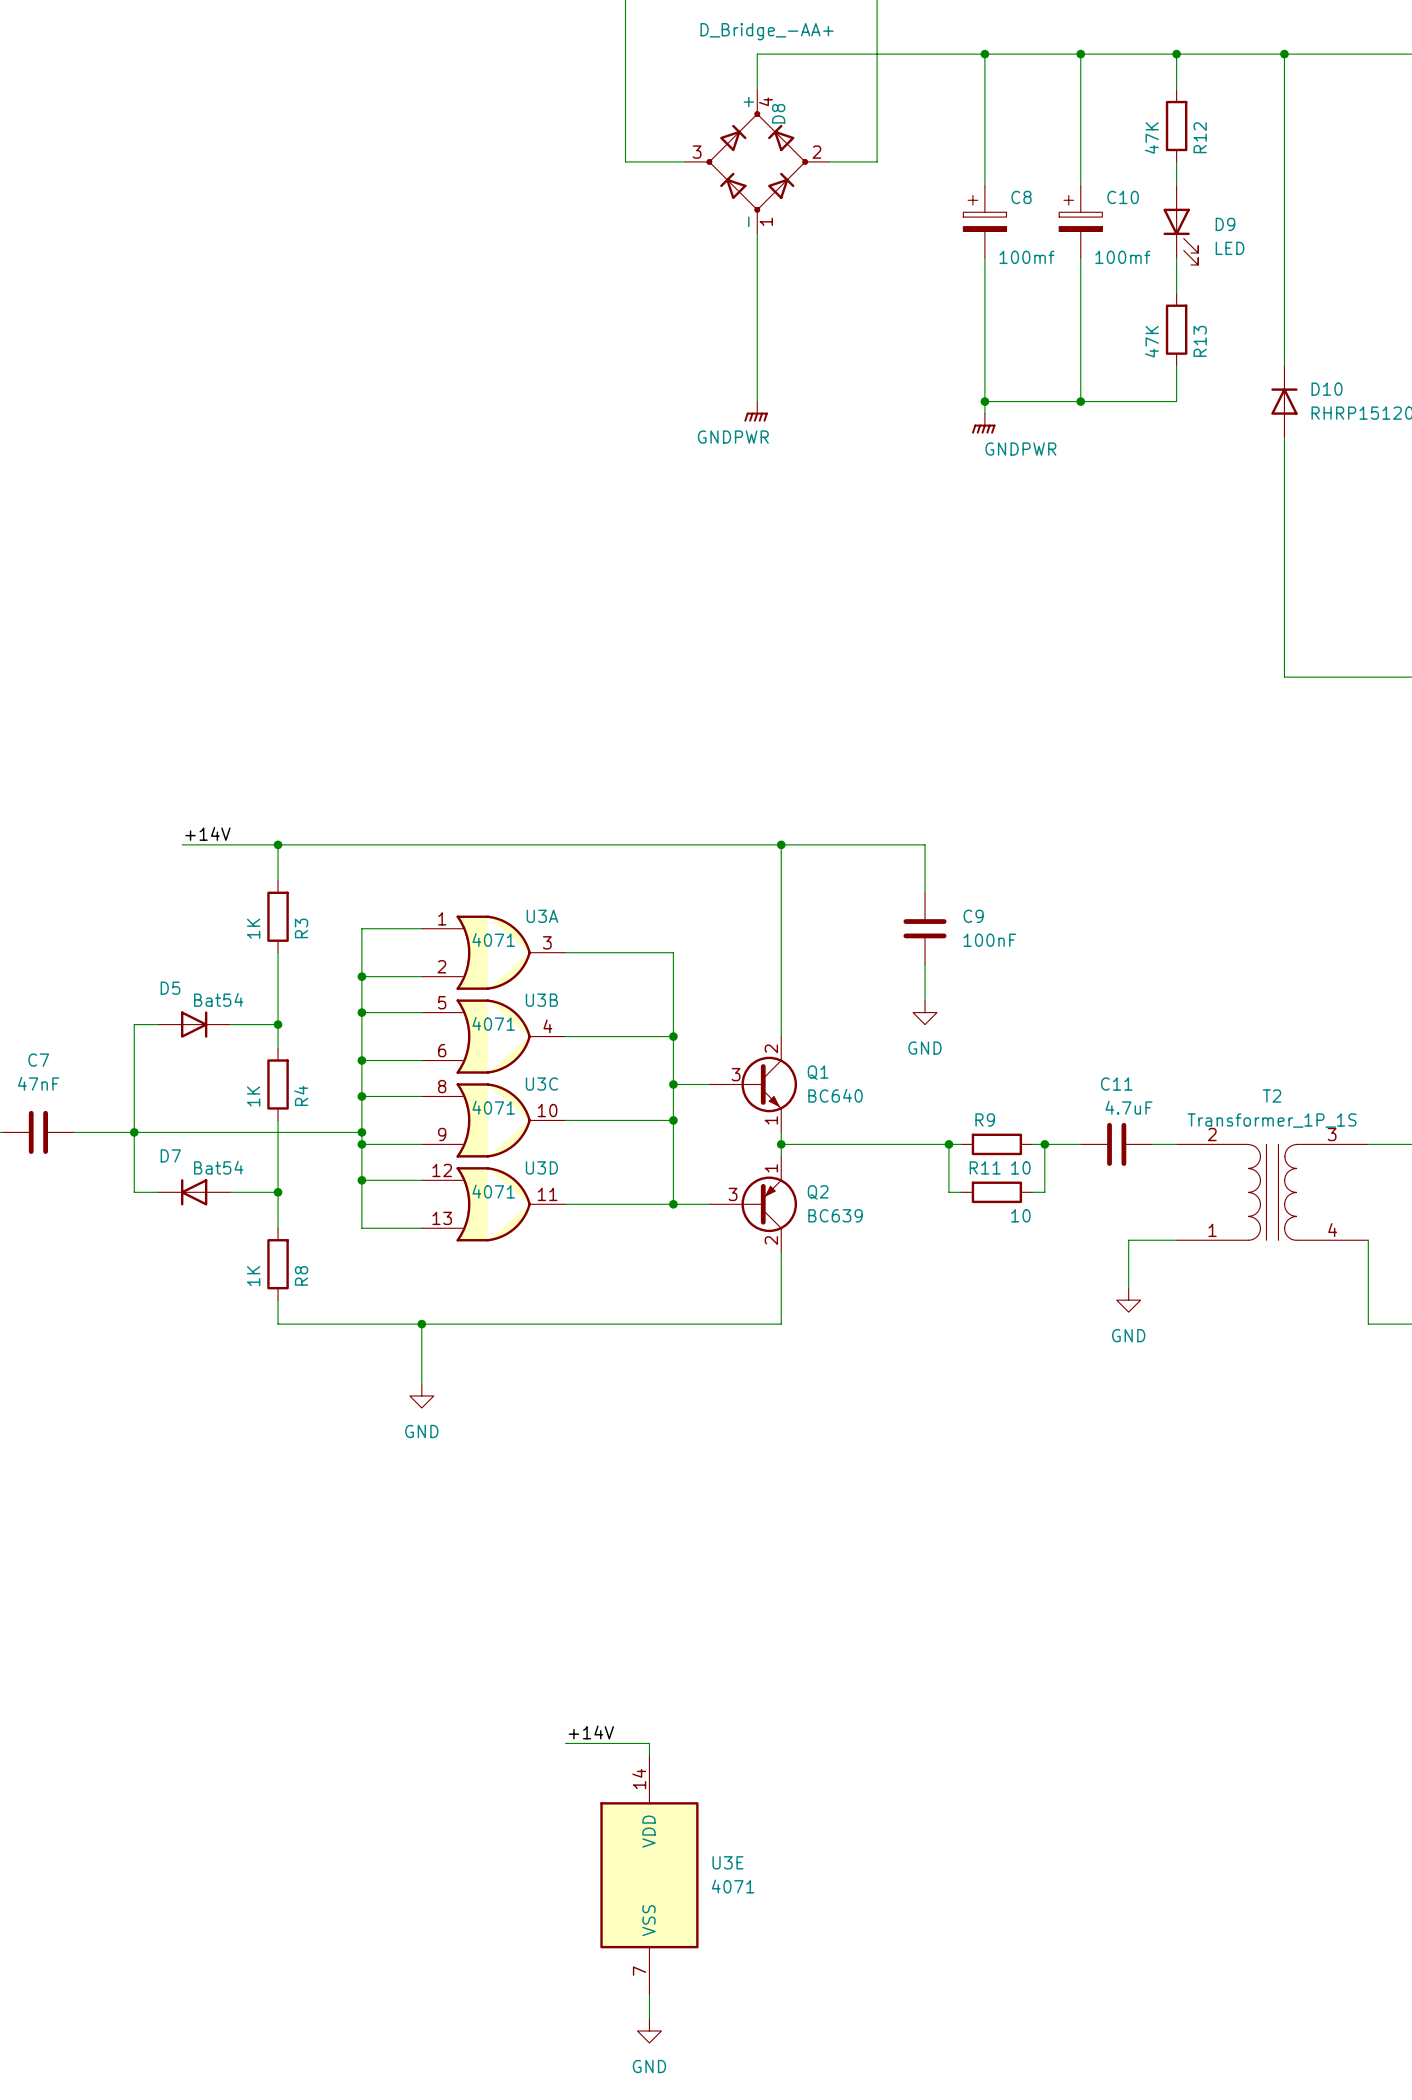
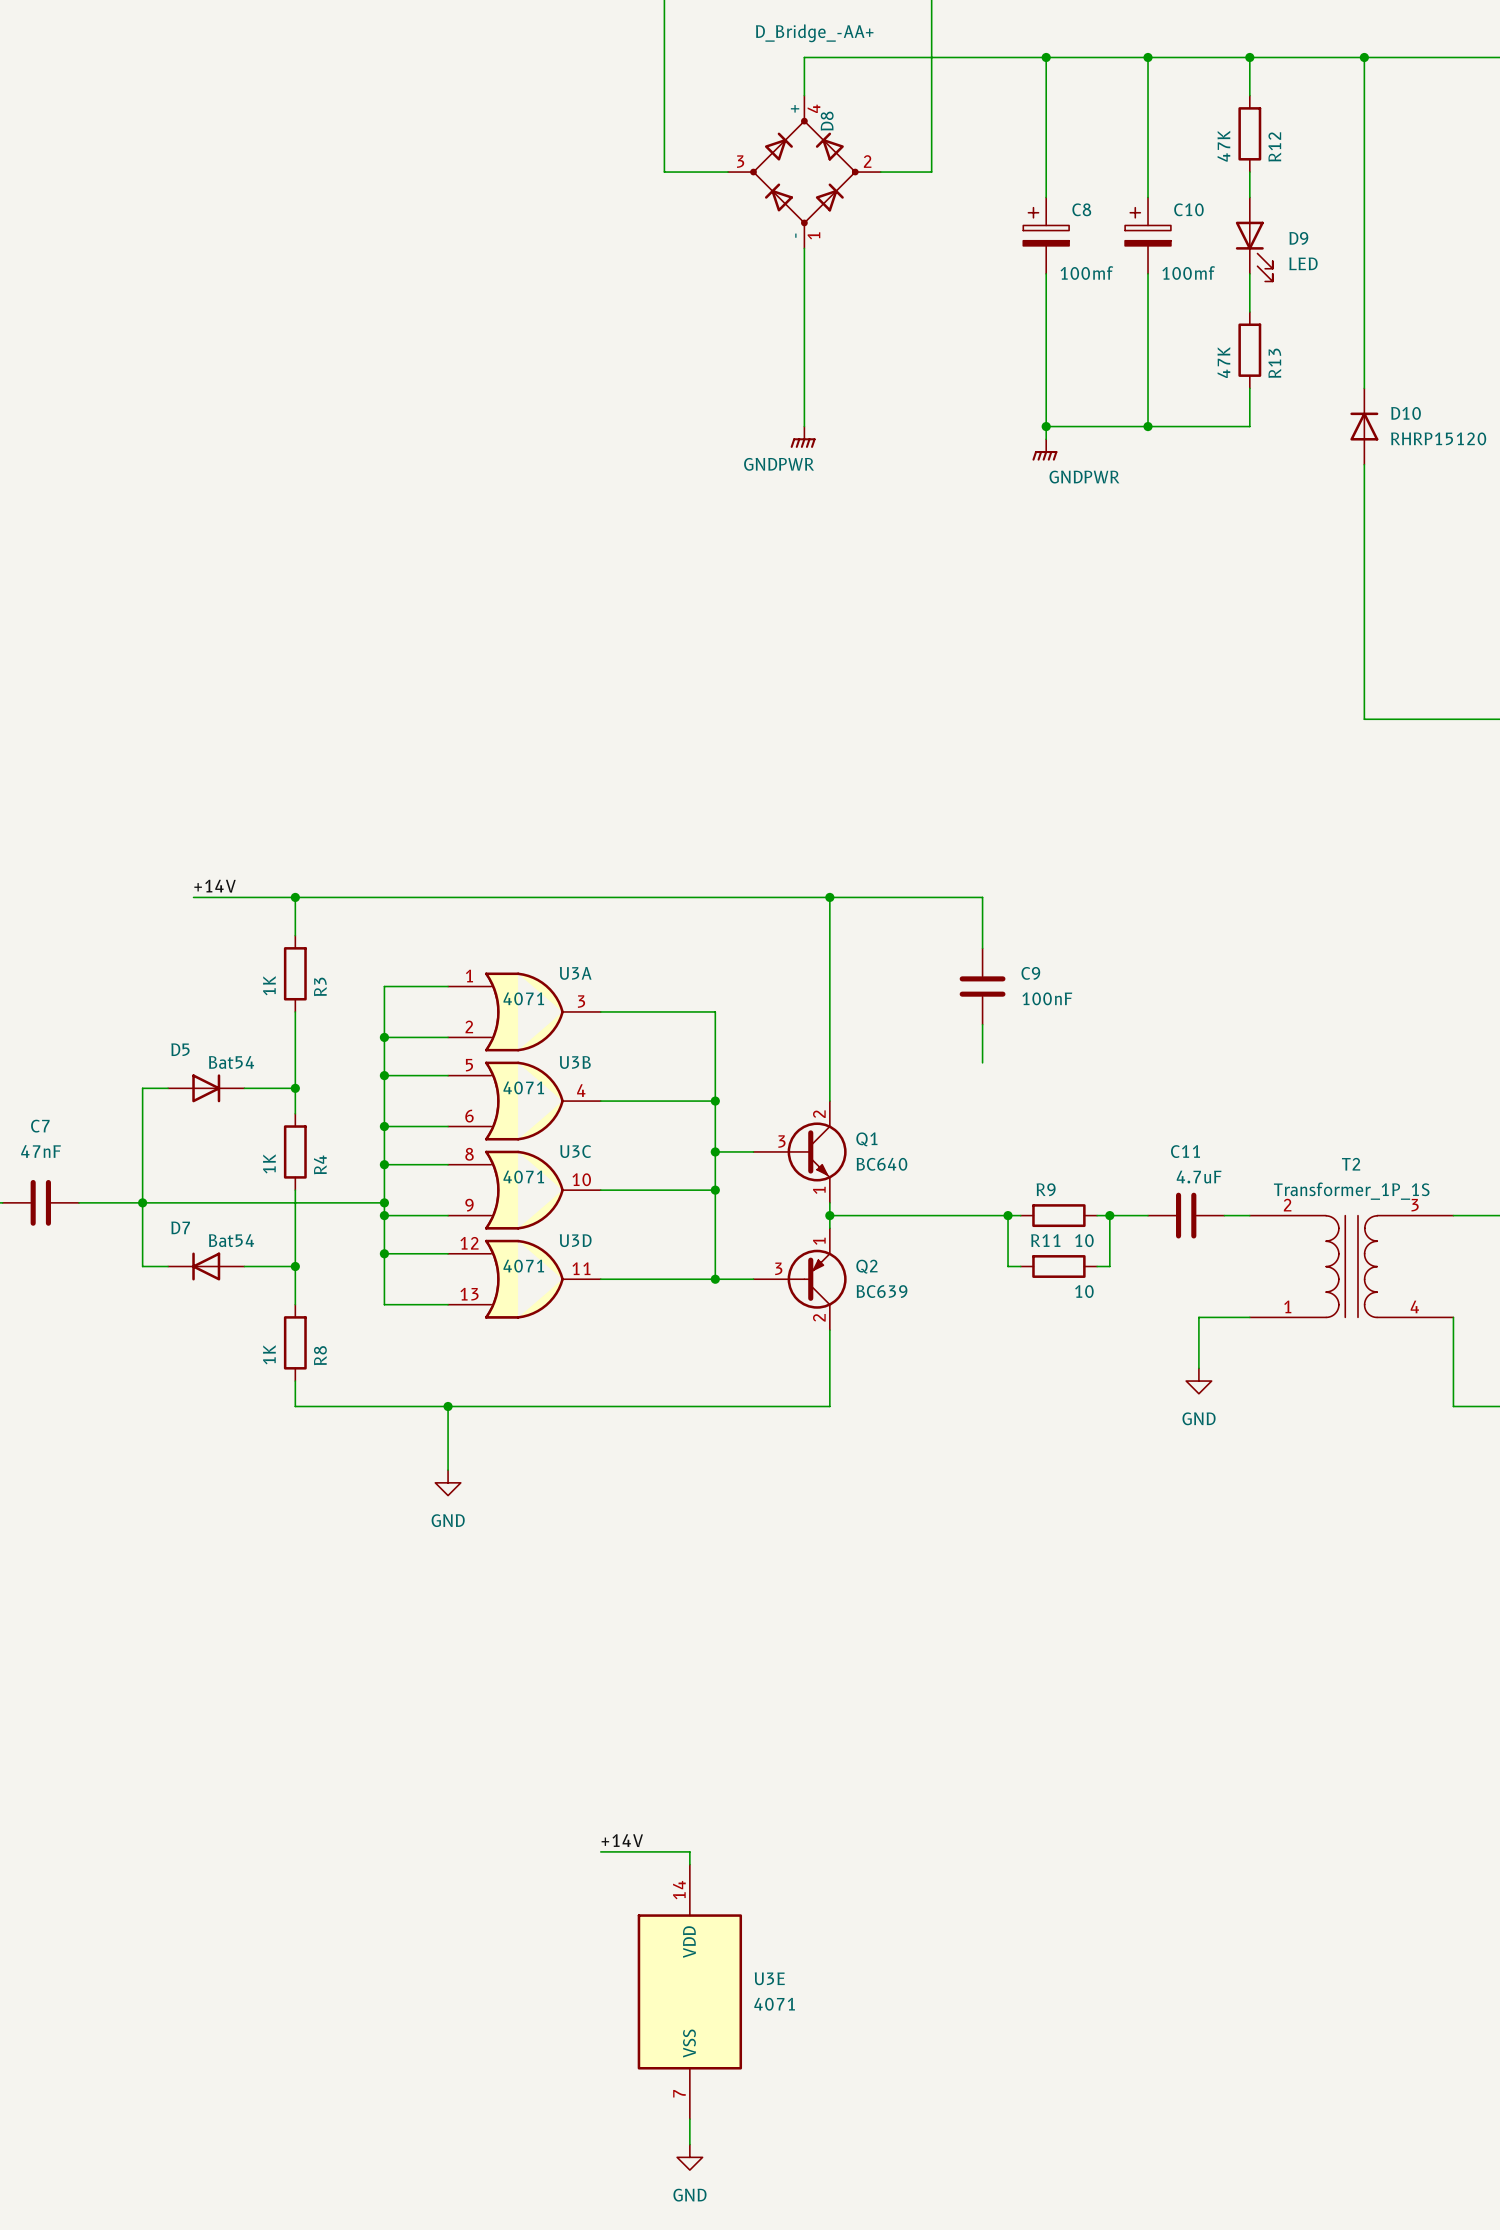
power symbol: GND (925, 1012) -> none

